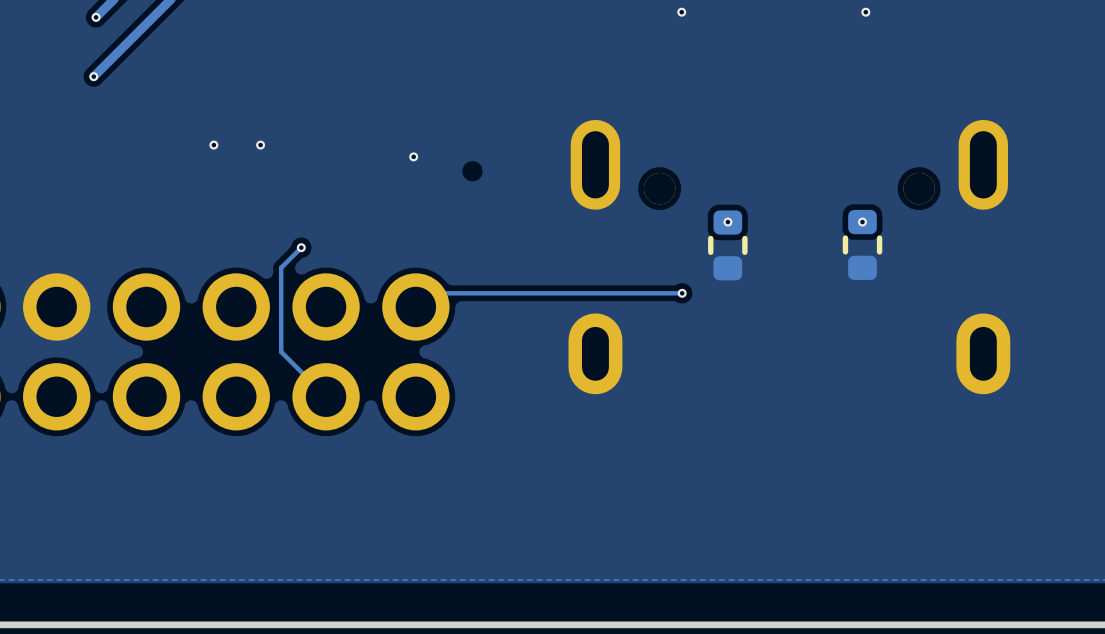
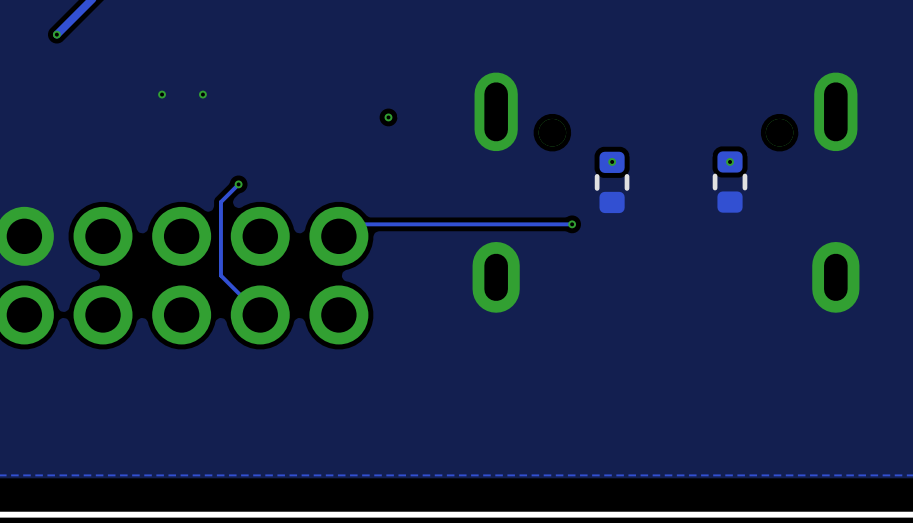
via position: (413, 156) -> (388, 117)

